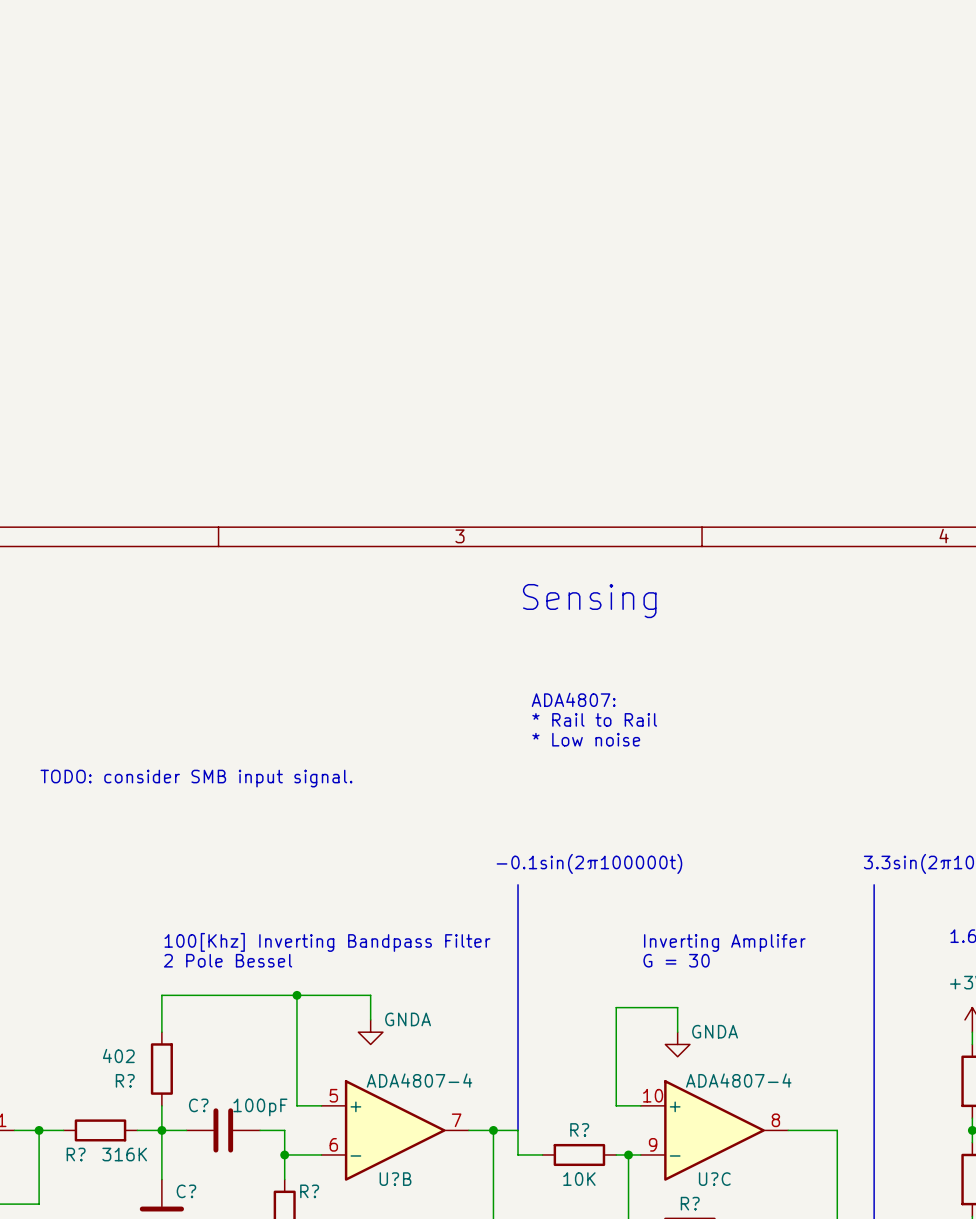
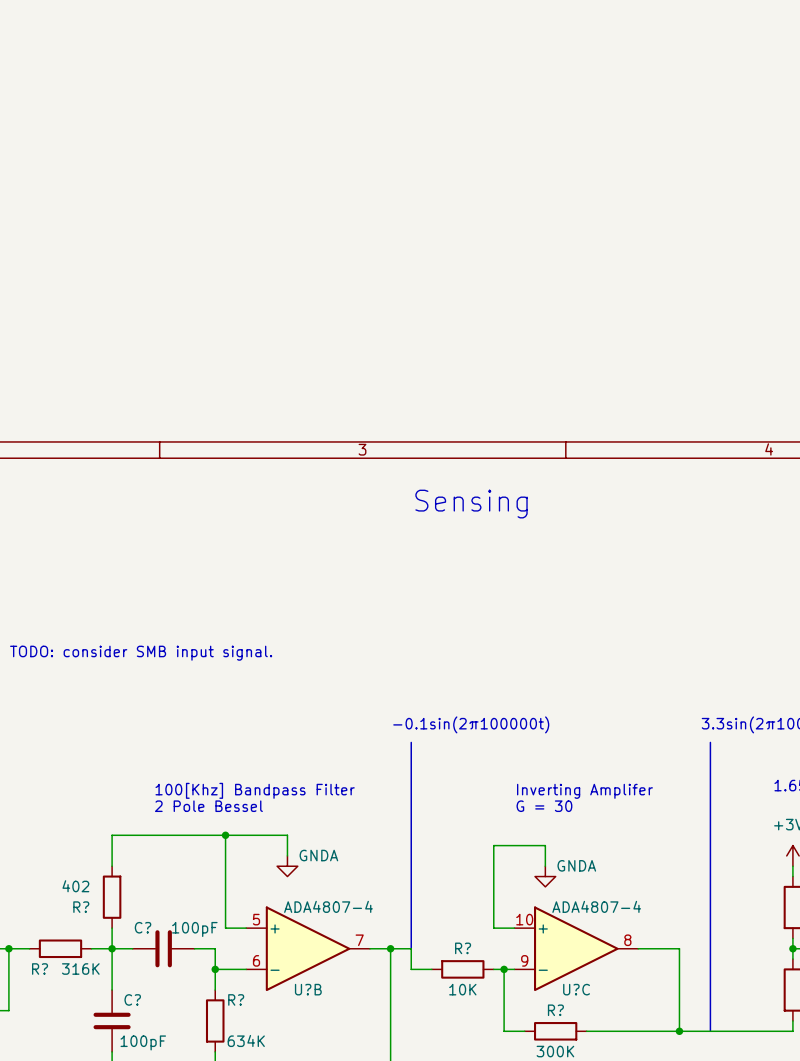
text: ADA4807: (573, 699) -> none
text: * Rail to Rail (594, 719) -> none
text: * Low noise (586, 739) -> none
text: 100[Khz] Inverting Bandpass Filter (327, 942) -> 100[Khz] Bandpass Filter (255, 790)
text position: 2 Pole Bessel (228, 960) -> 2 Pole Bessel (208, 806)

